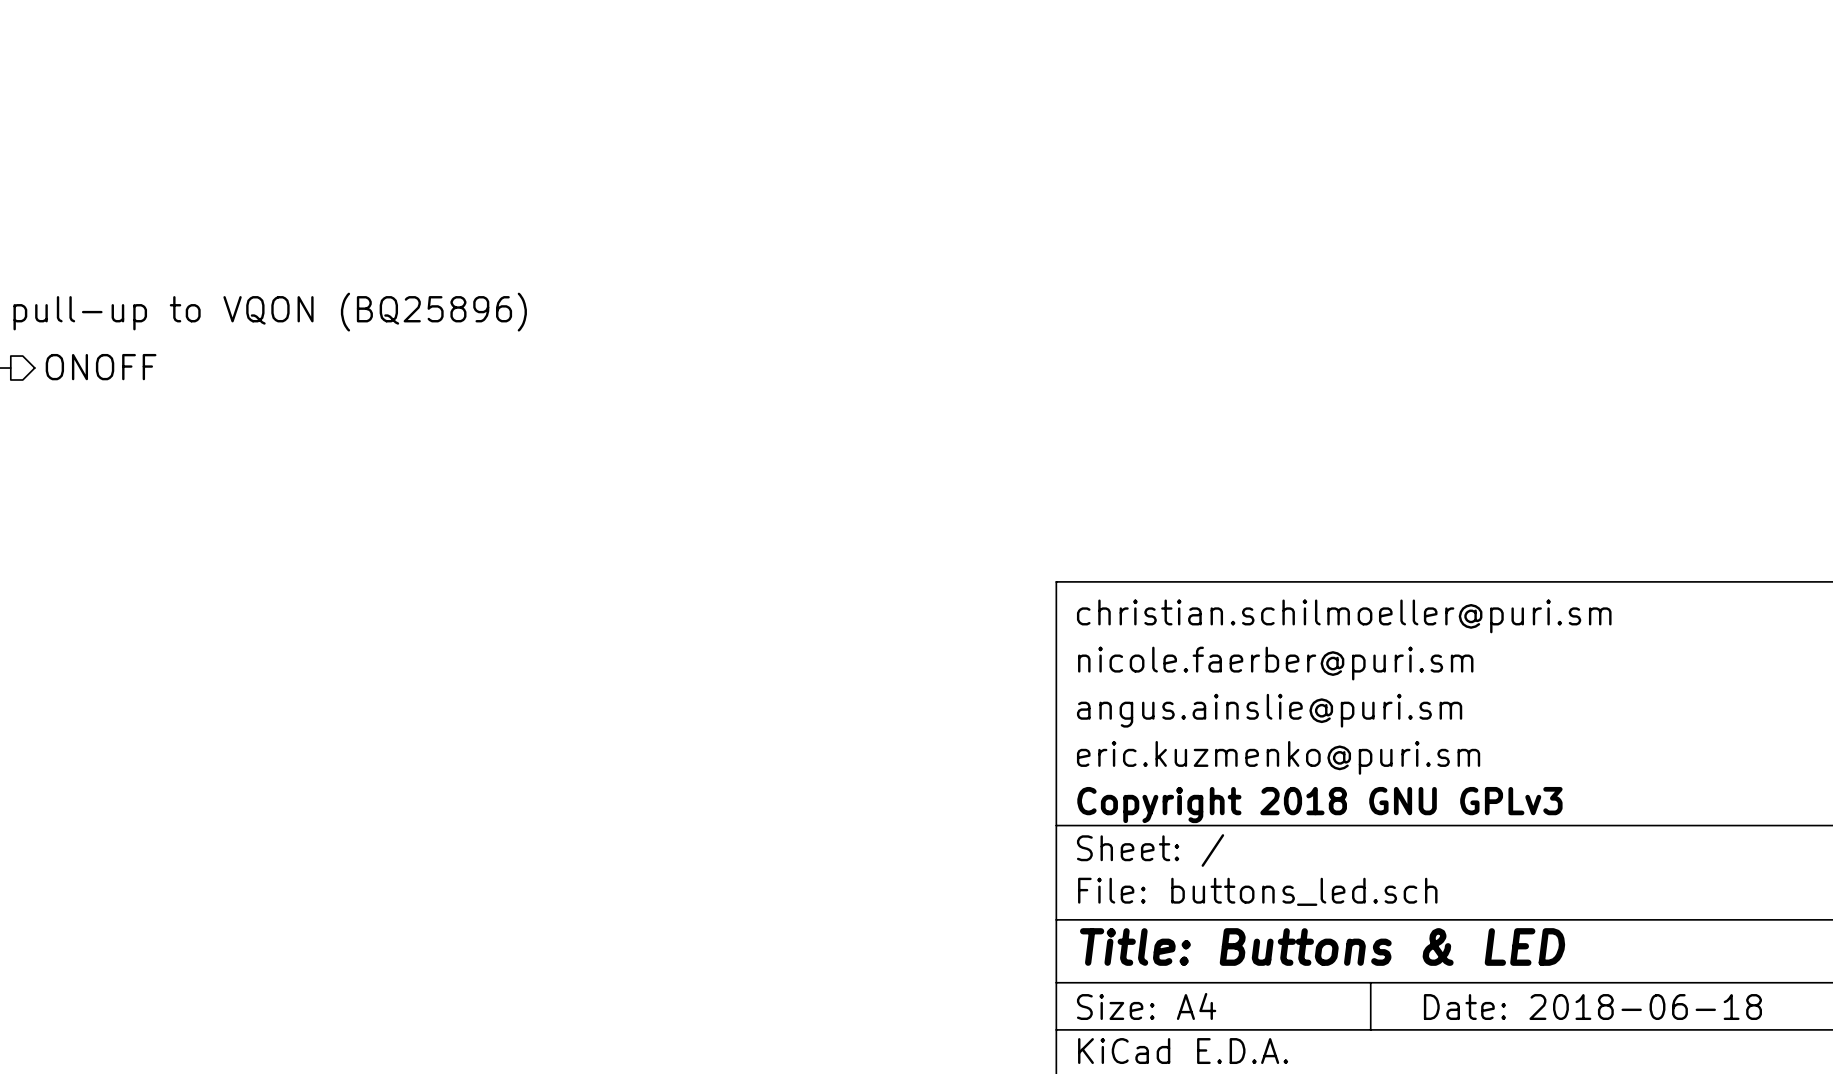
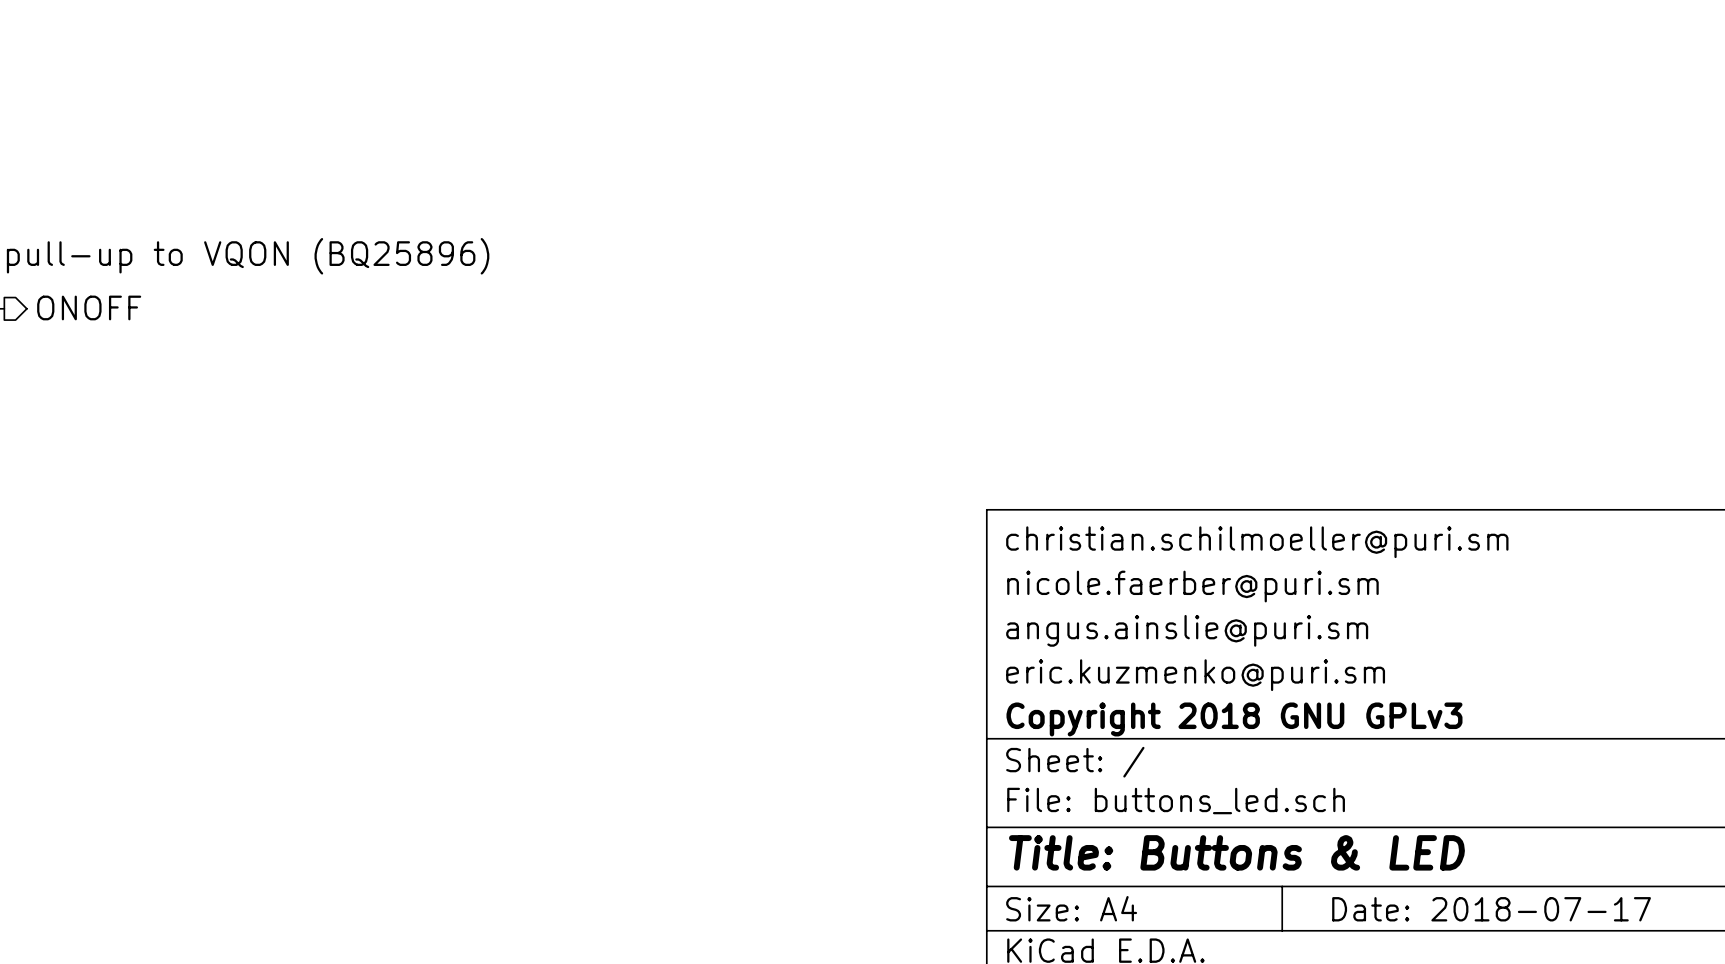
title block: Date: 2018-06-18 (1592, 1007) -> Date: 2018-07-17 (1491, 909)

